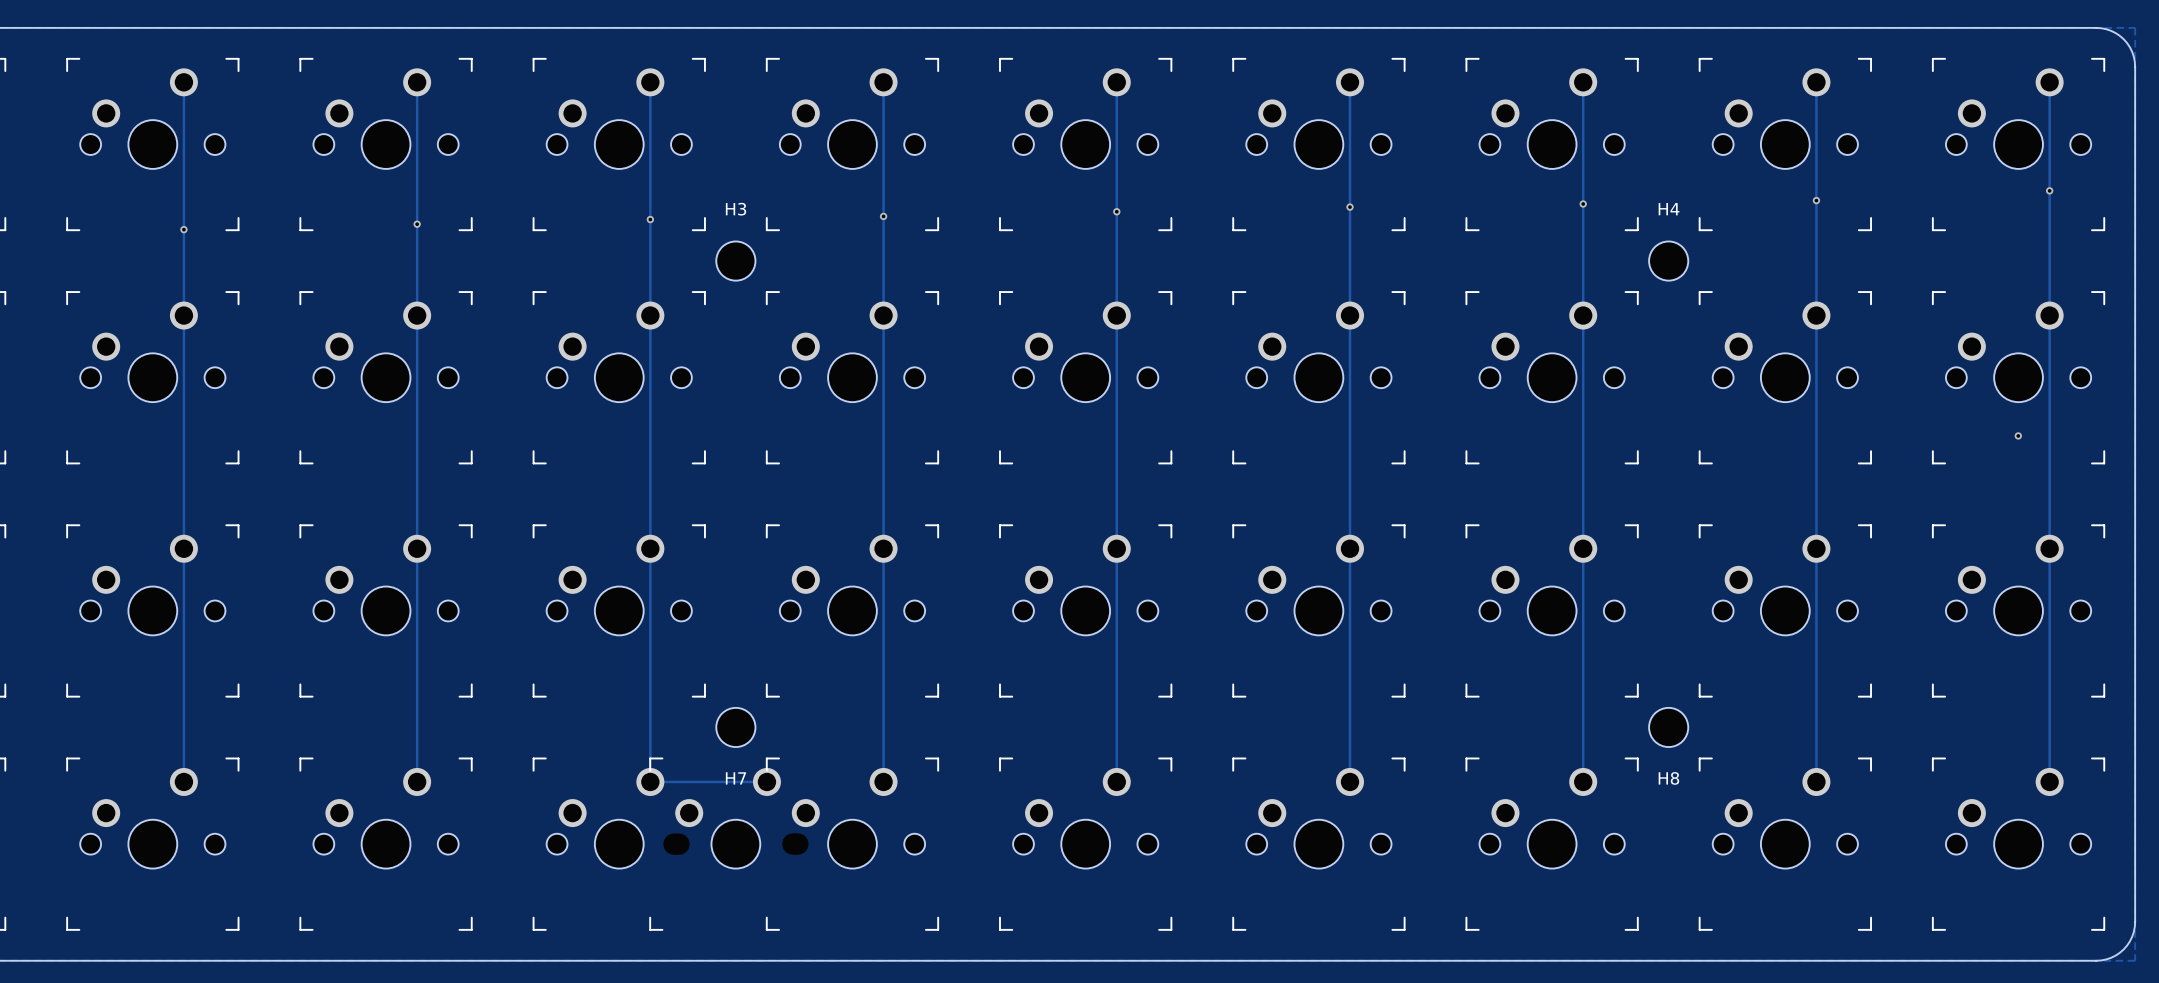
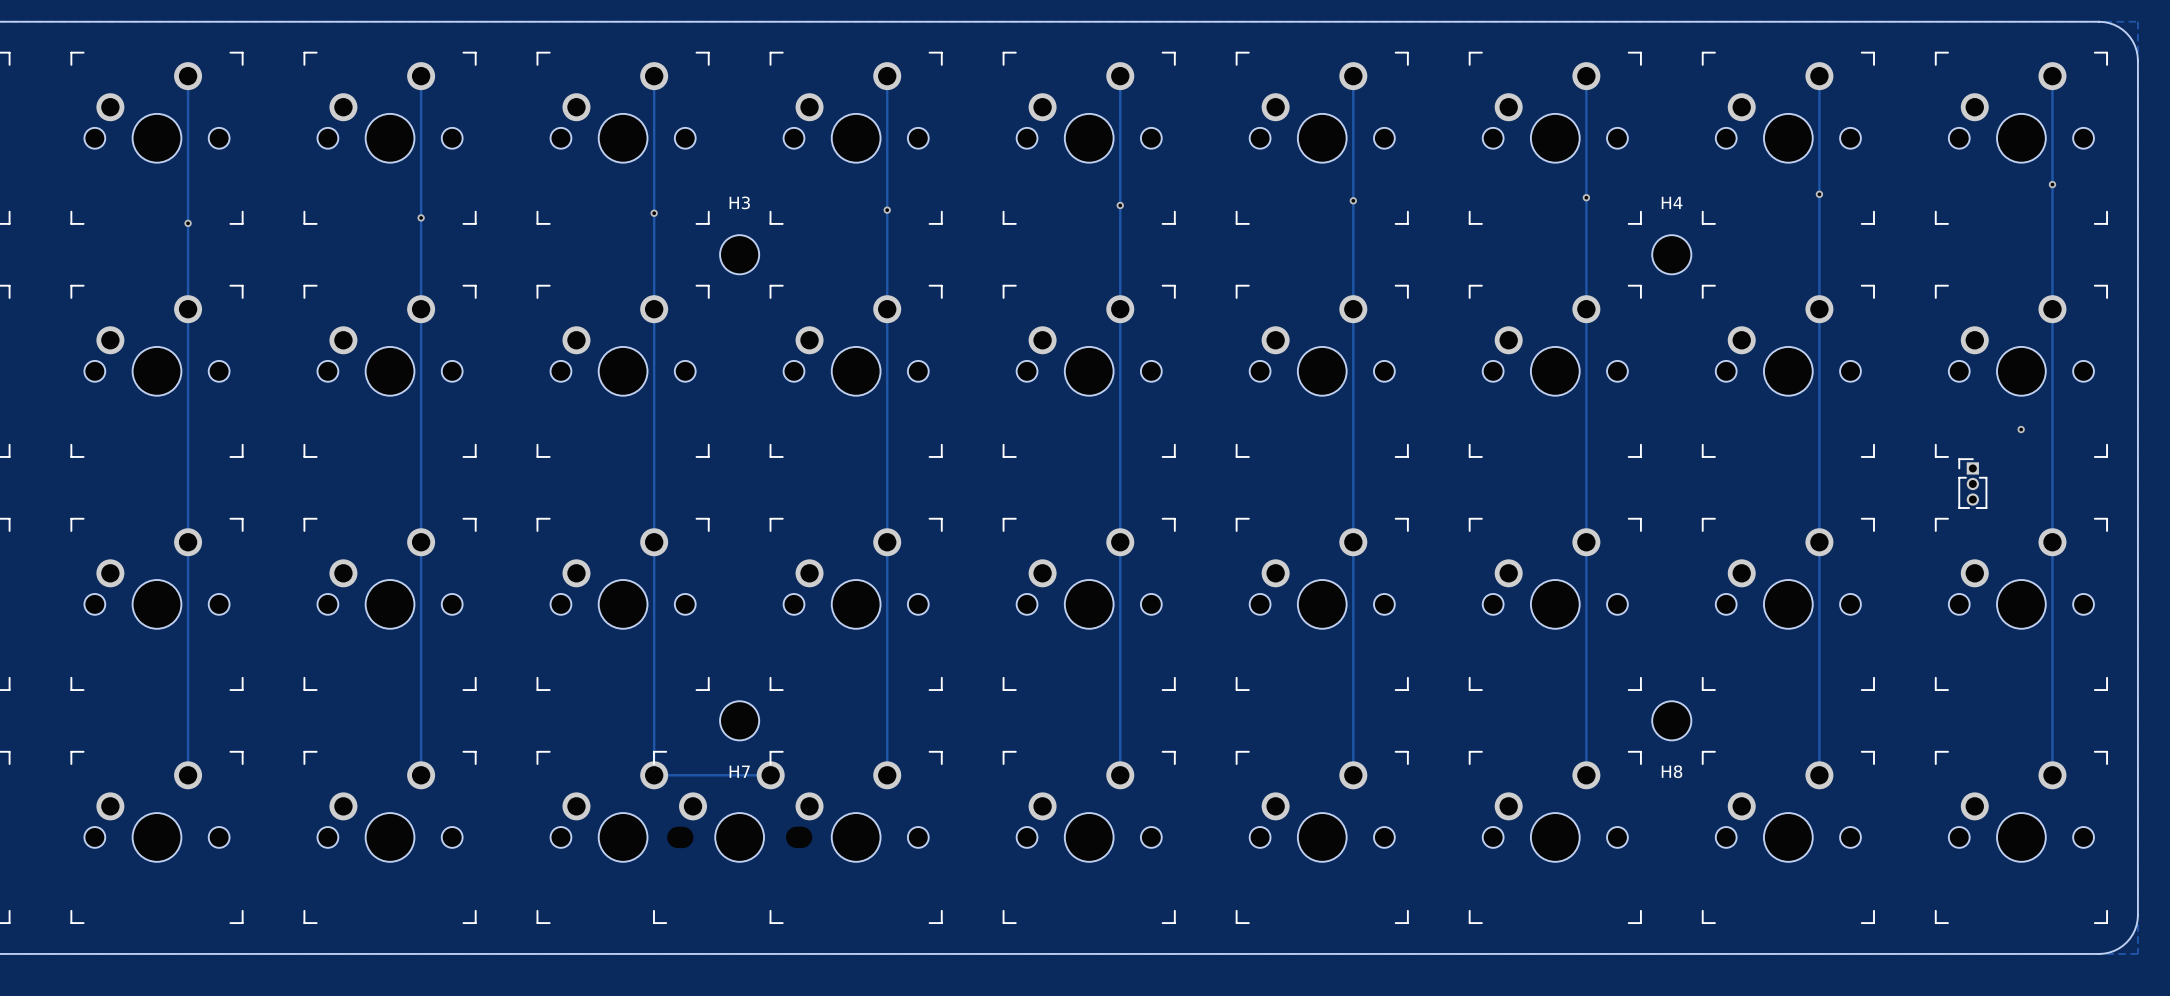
part: none -> (1972, 483)

